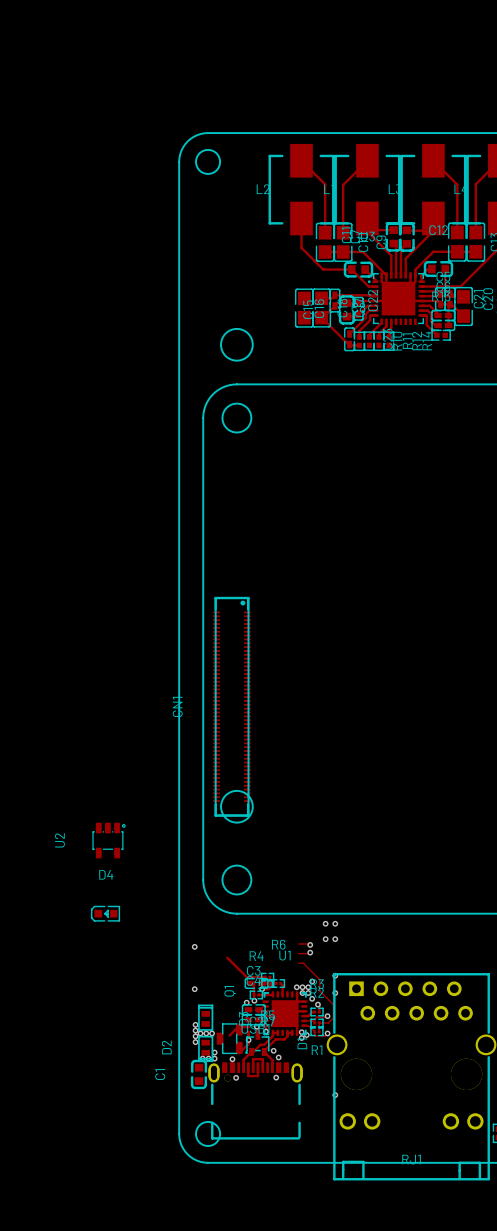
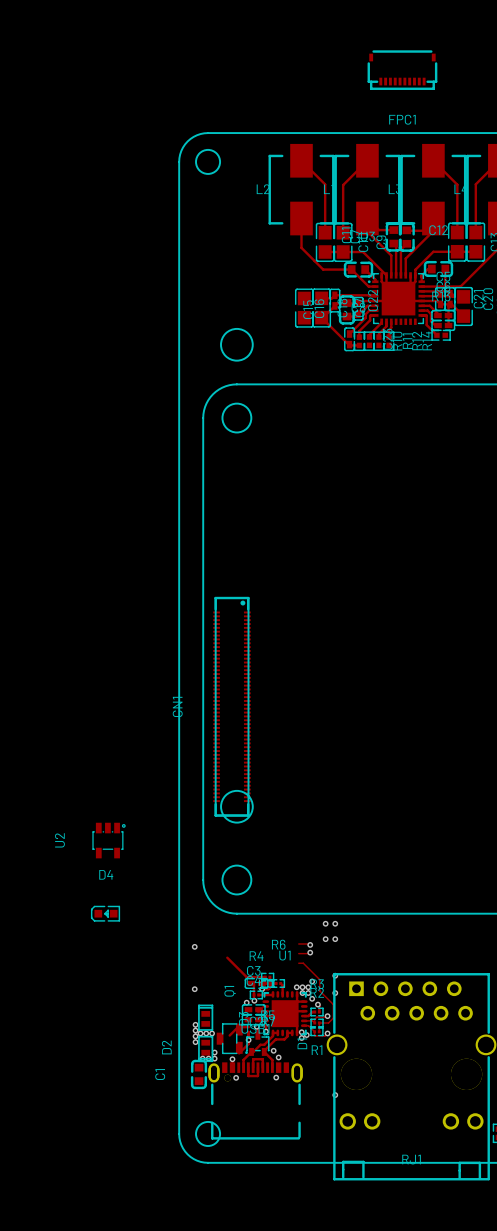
FPC1: none -> (402, 70)

